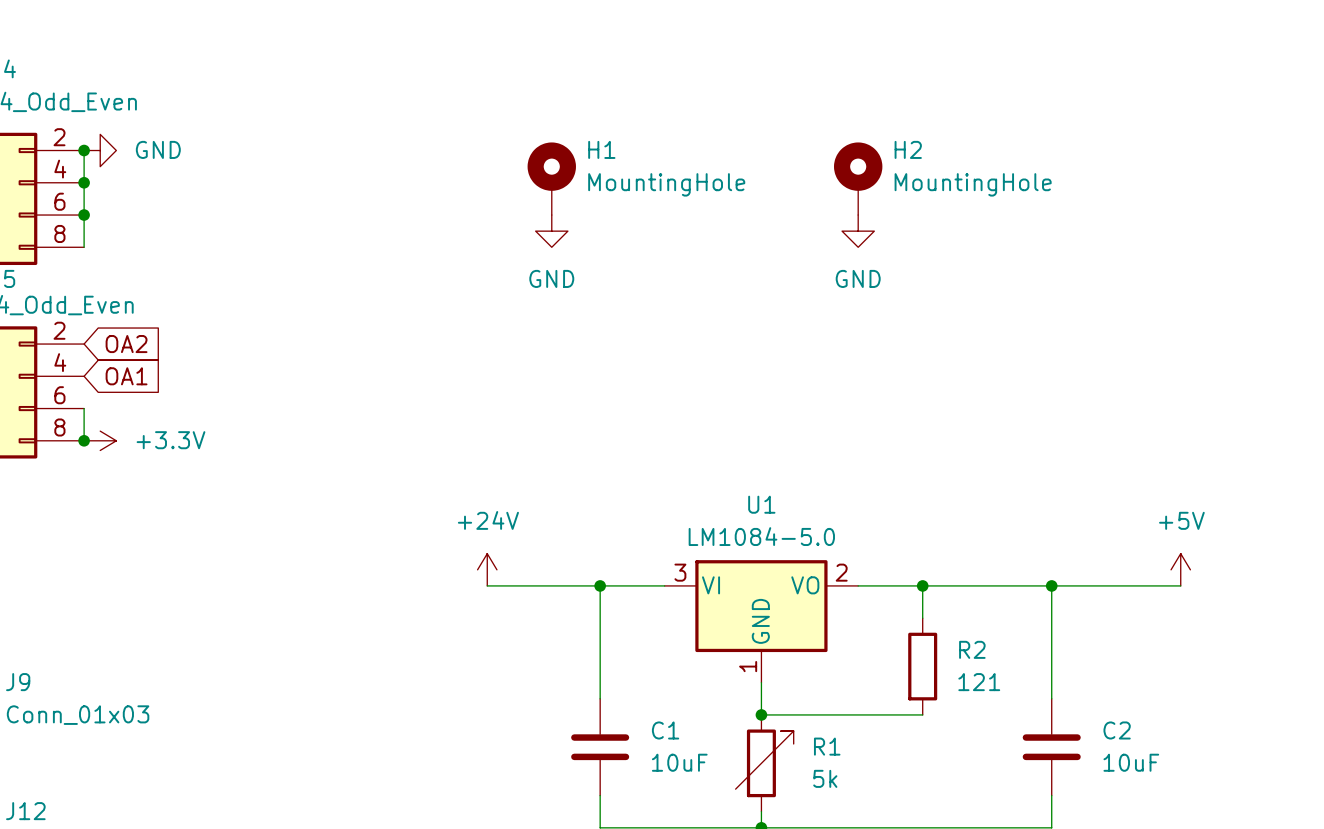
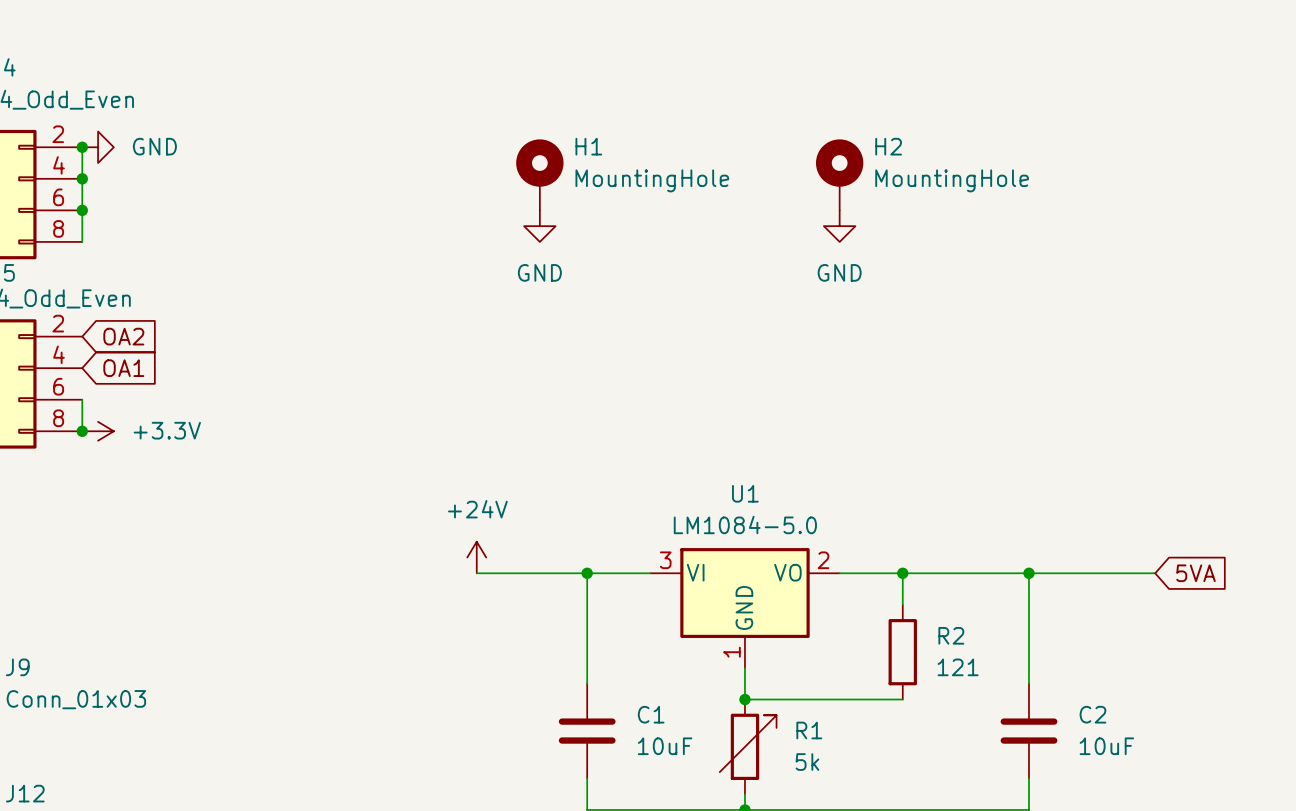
power symbol: +5V (1180, 569) -> none
global label: none -> 5VA (1196, 573)

